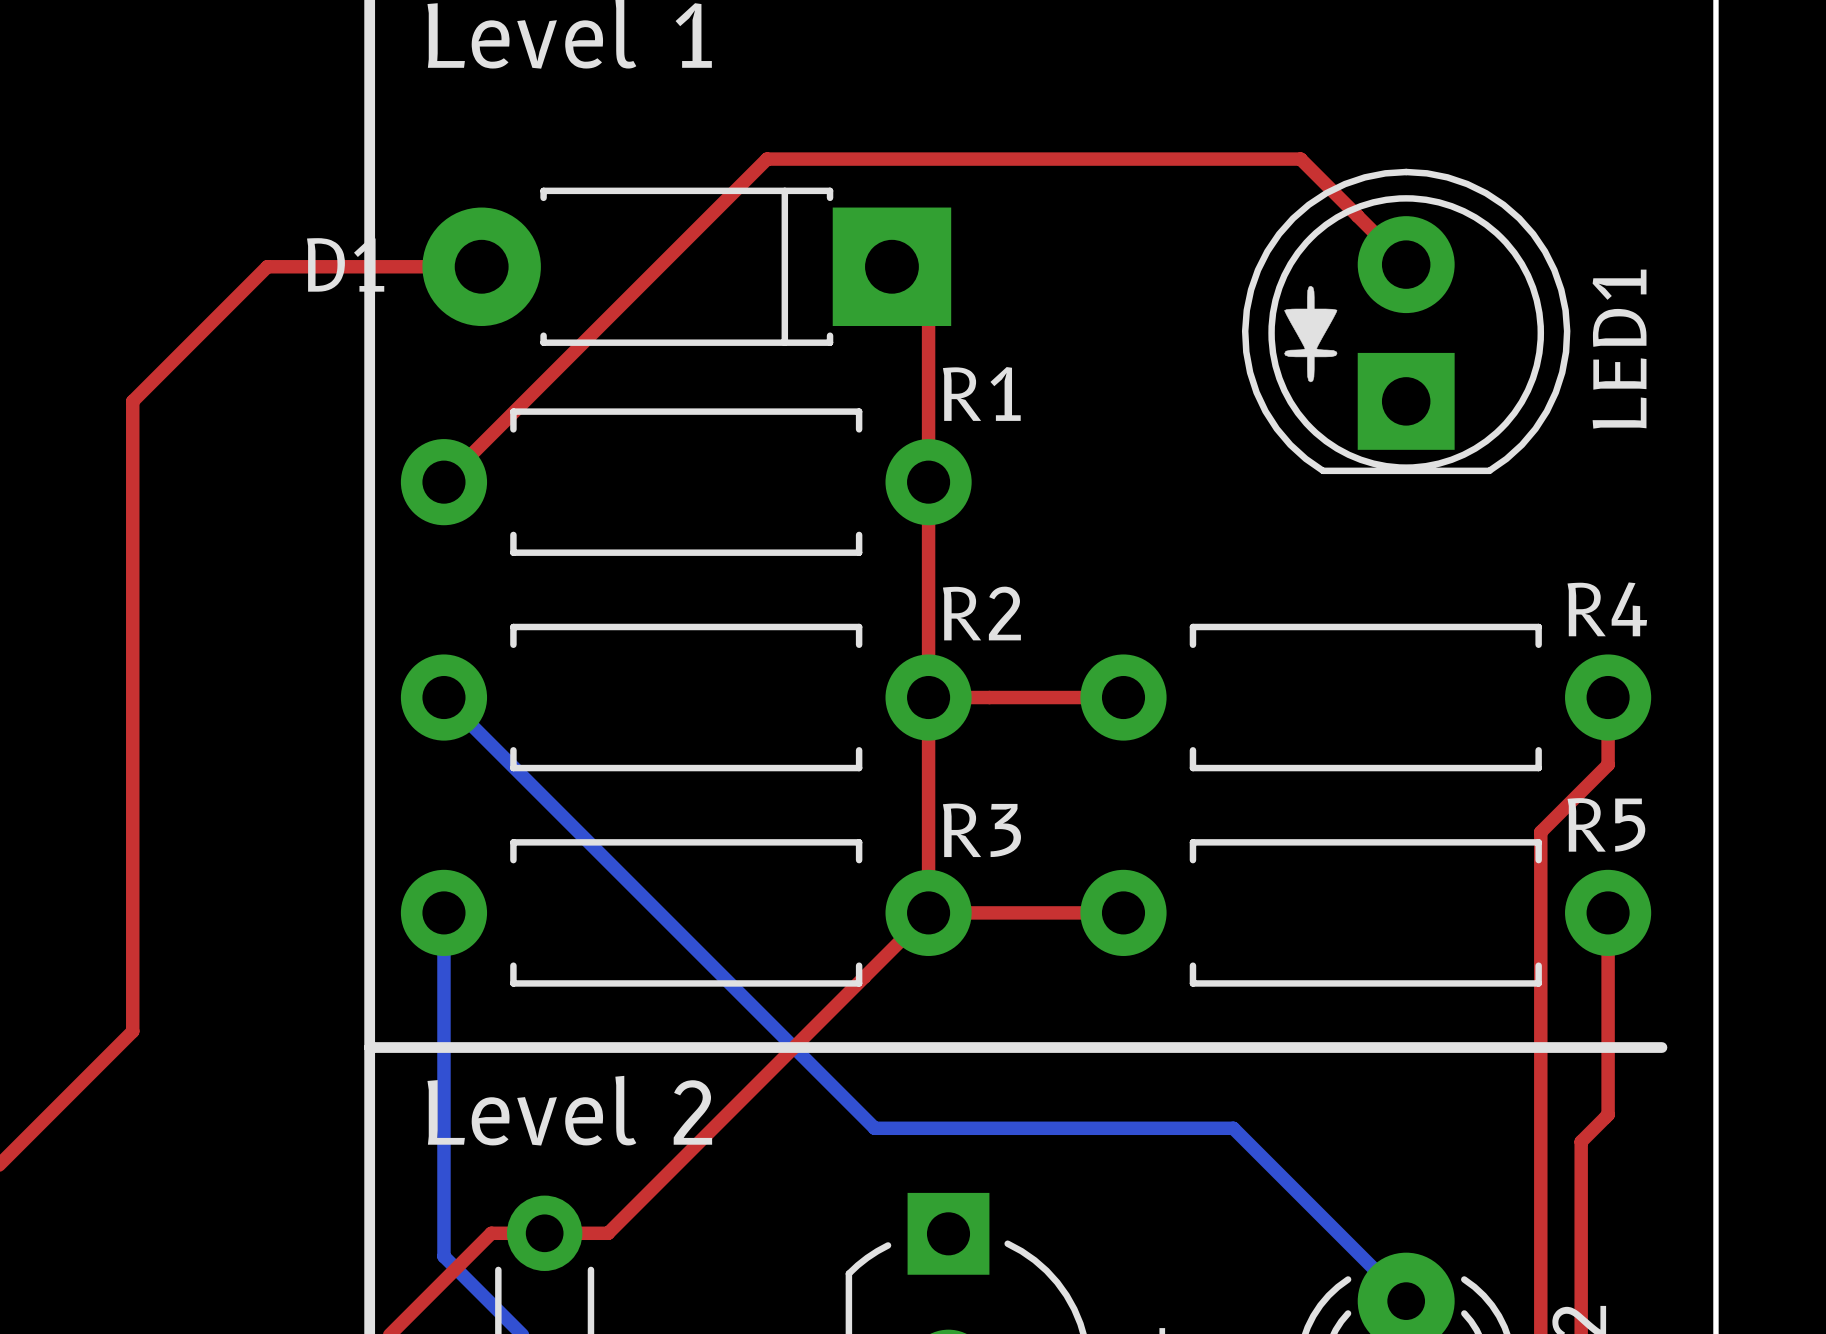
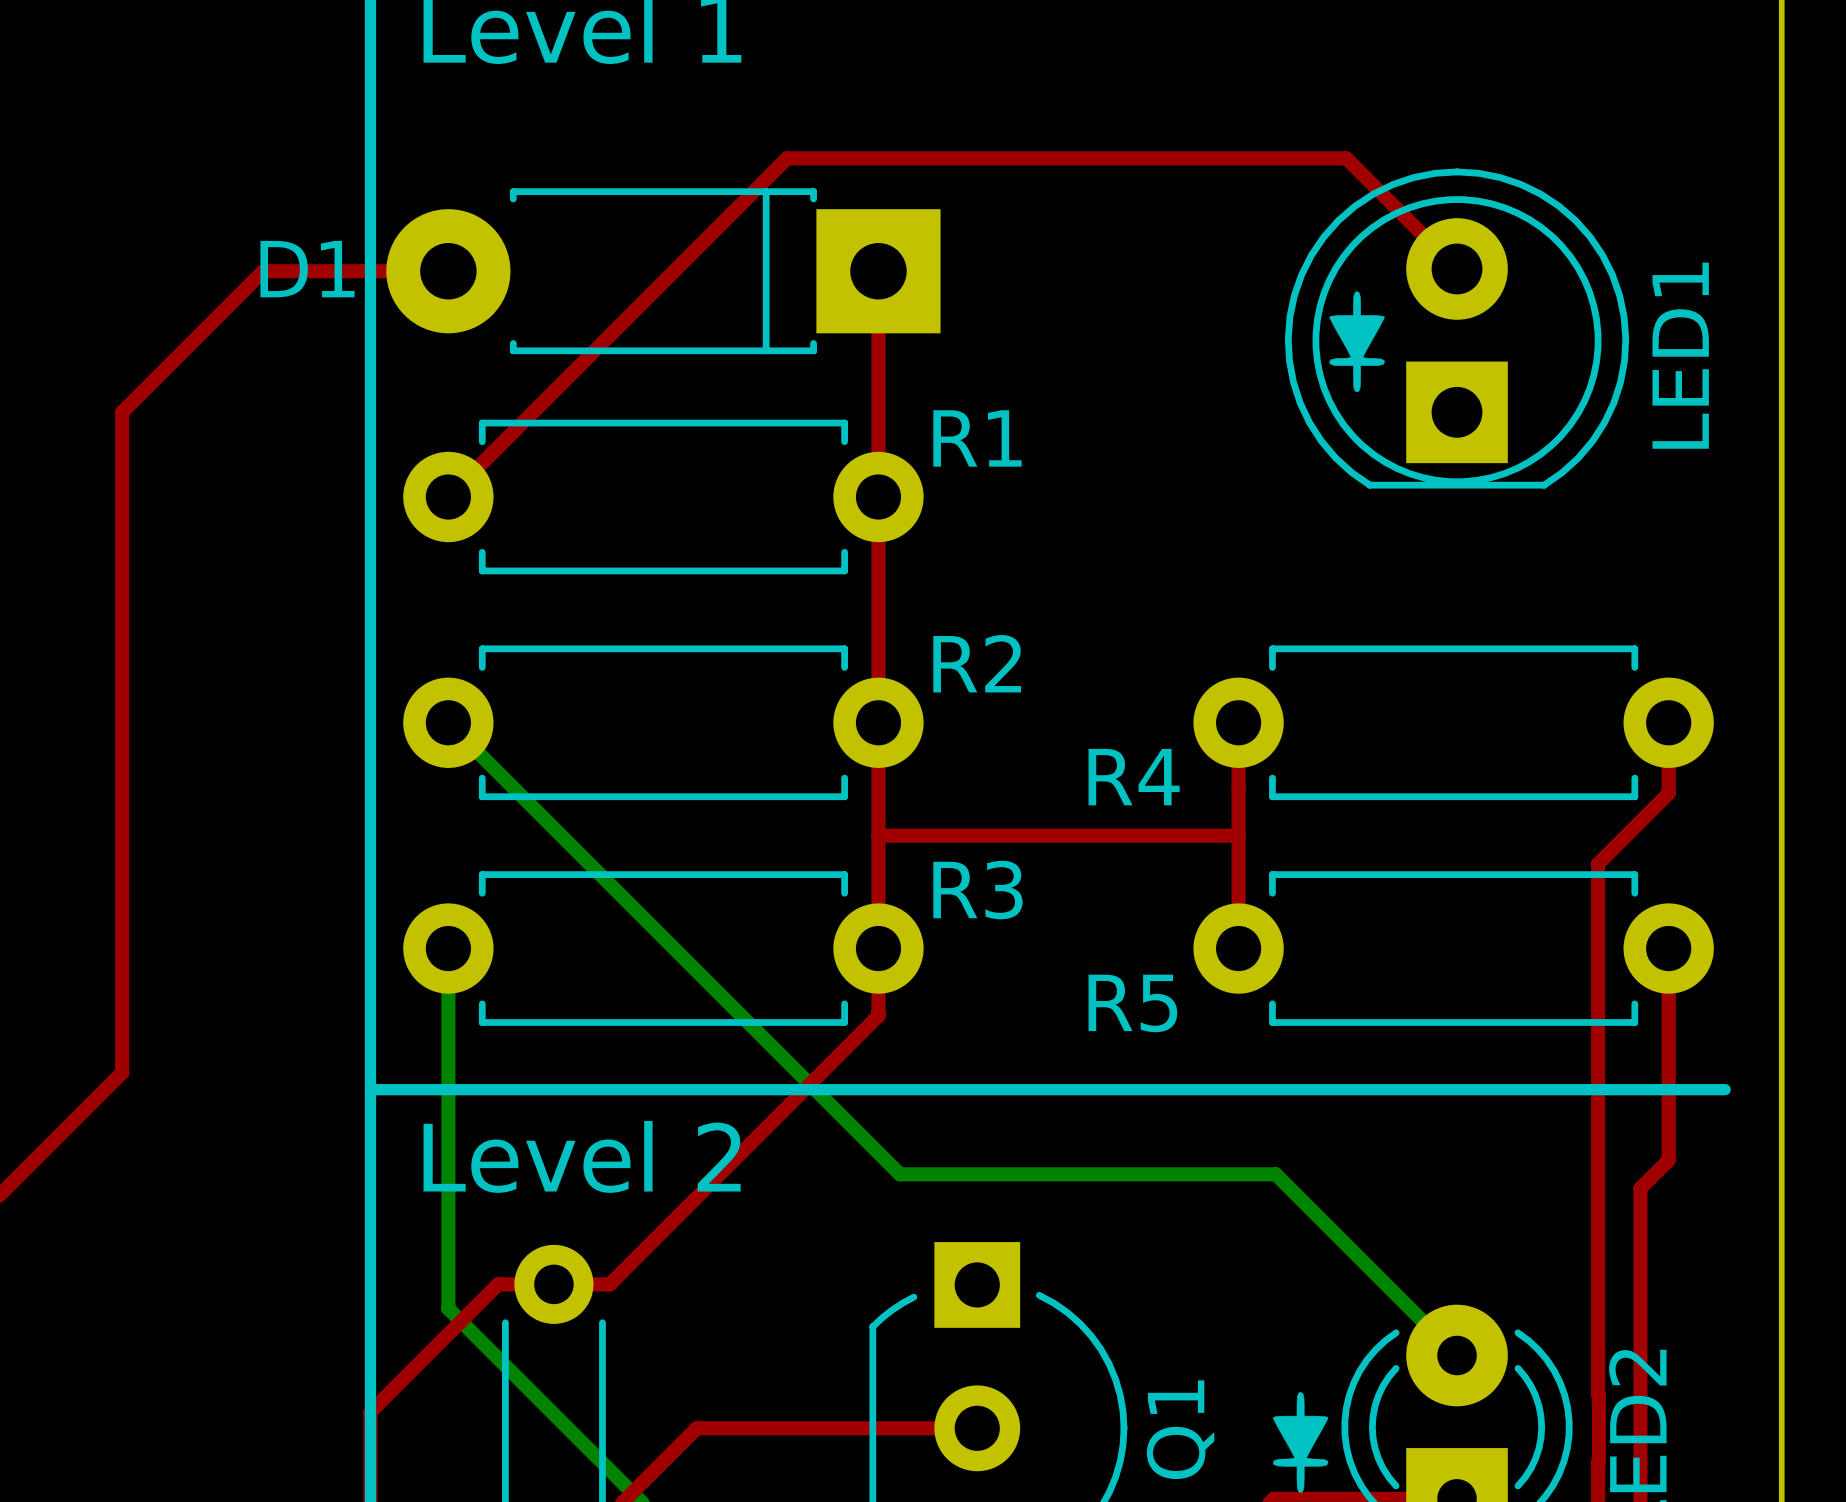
D1 position: (686, 266) -> (663, 271)
top track: (891, 266) (928, 303) (928, 912) -> none
R1 footprint: [400, 408, 972, 556] -> [403, 419, 924, 575]
R4 name position: R4 (1607, 609) -> R4 (1134, 777)
R2 footprint: [400, 623, 972, 772] -> [403, 645, 924, 801]
R4 footprint: [1080, 623, 1652, 772] -> [1193, 645, 1714, 801]
top track: (928, 697) (1123, 697) -> none
top track: none -> (1238, 722) (1238, 948)
top track: none -> (878, 835) (1238, 835)
R5 name position: R5 (1606, 824) -> R5 (1132, 1003)
R3 footprint: [400, 839, 972, 987] -> [403, 871, 924, 1026]
R5 footprint: [1080, 839, 1652, 987] -> [1193, 871, 1714, 1026]
top track: (928, 912) (608, 1233) (597, 1233) -> (878, 271) (878, 1015) (609, 1284)
top track: (928, 912) (1123, 912) -> none

